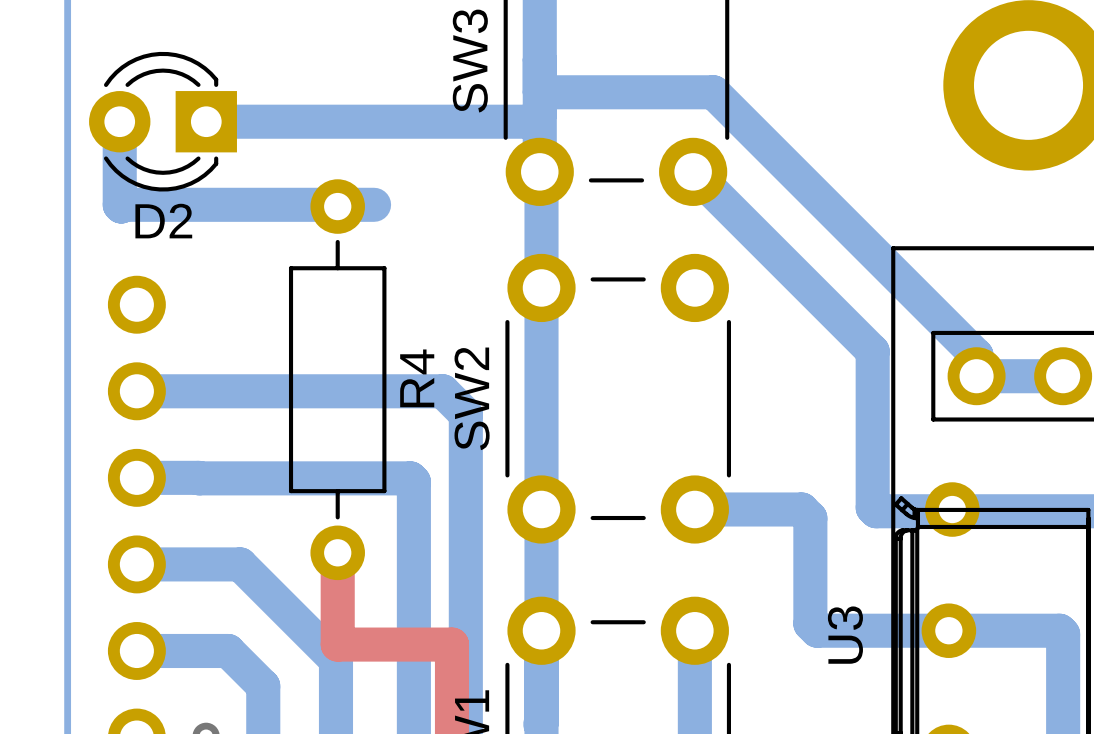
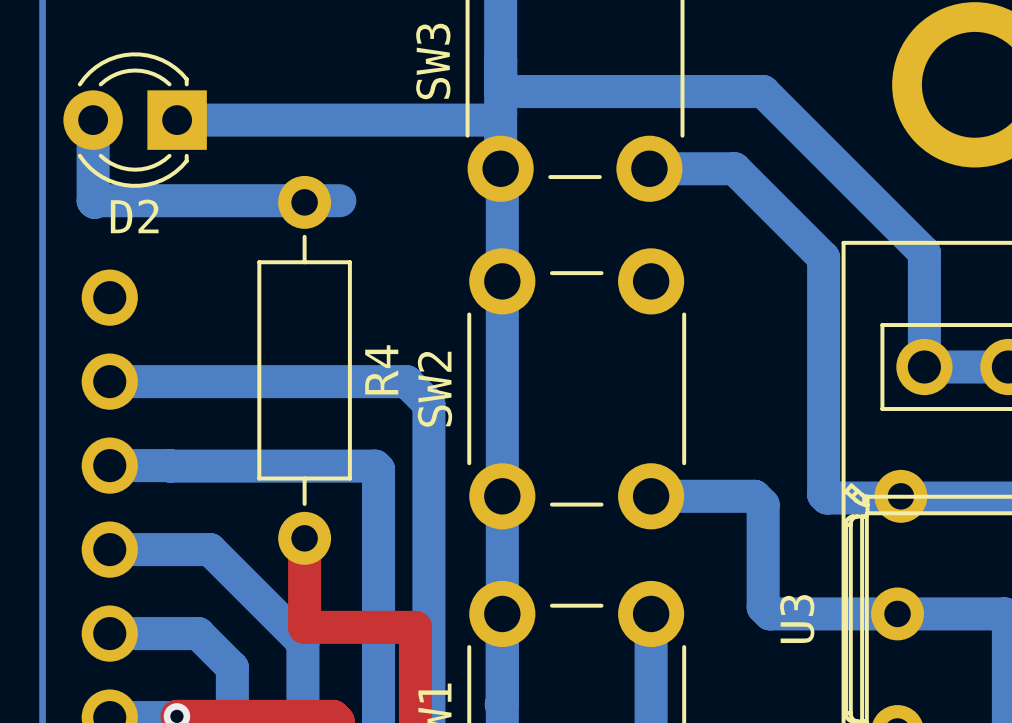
bottom track: (713, 92) (976, 355) -> (669, 91) (763, 91) (924, 252) (924, 346)
bottom track: (693, 171) (872, 351) -> (649, 168) (734, 168) (823, 257) (823, 342)

